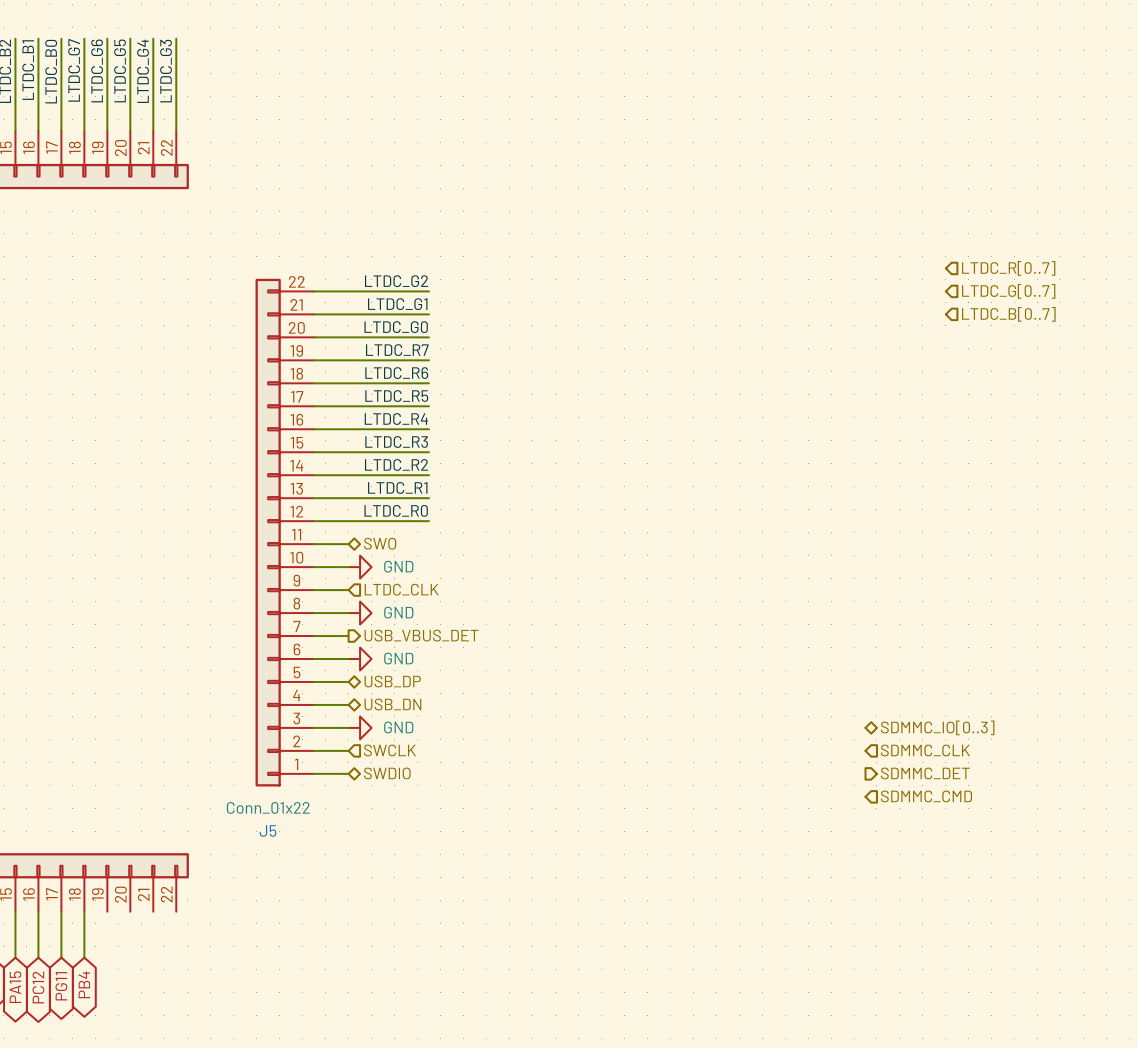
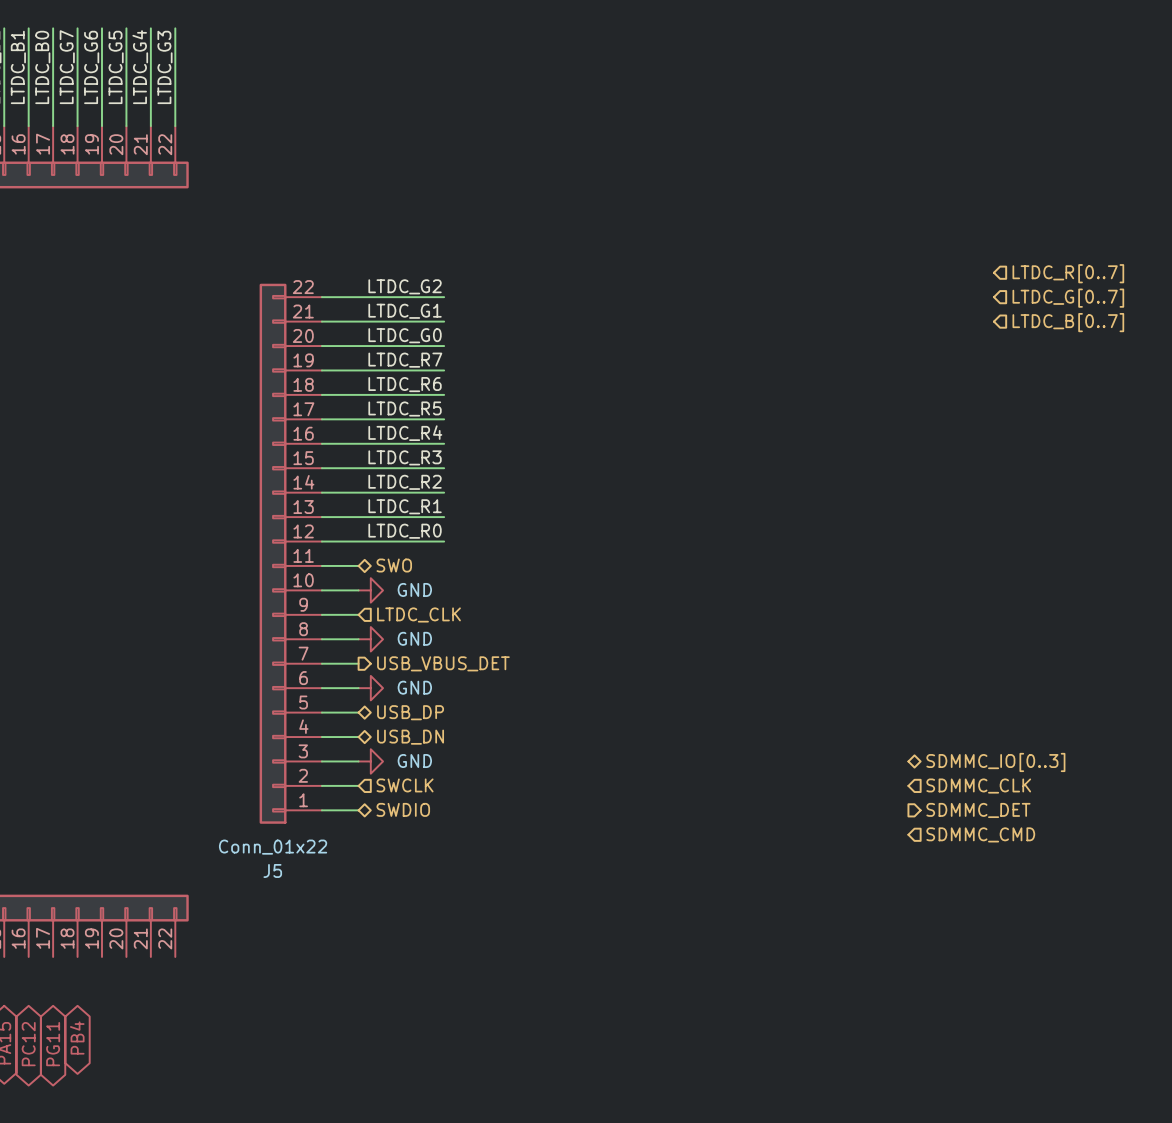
wire: (15, 911) (15, 957) -> none
wire: (38, 911) (38, 957) -> none
wire: (61, 911) (61, 957) -> none
wire: (84, 911) (84, 957) -> none

